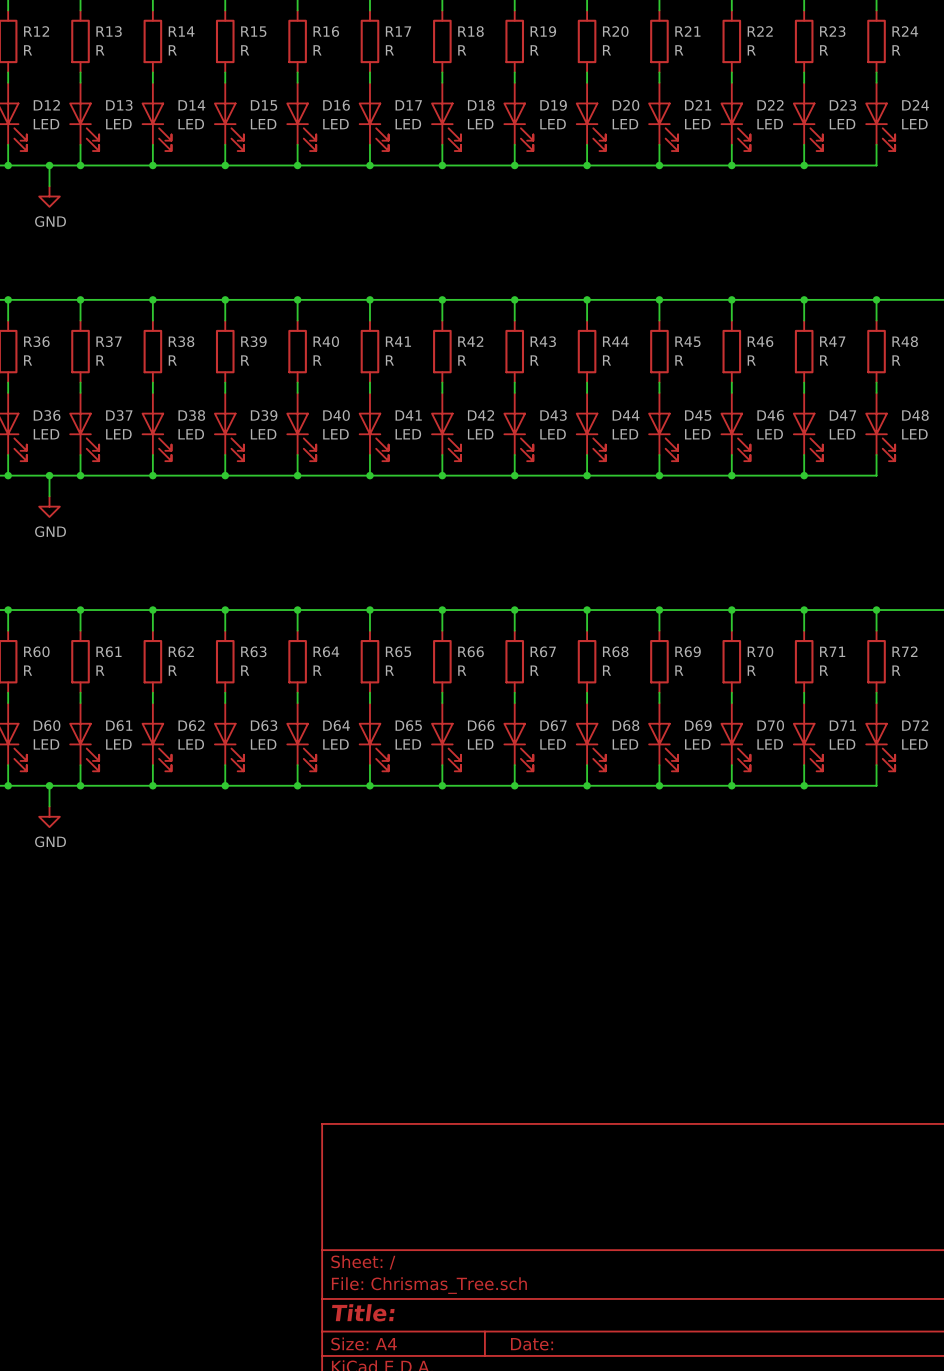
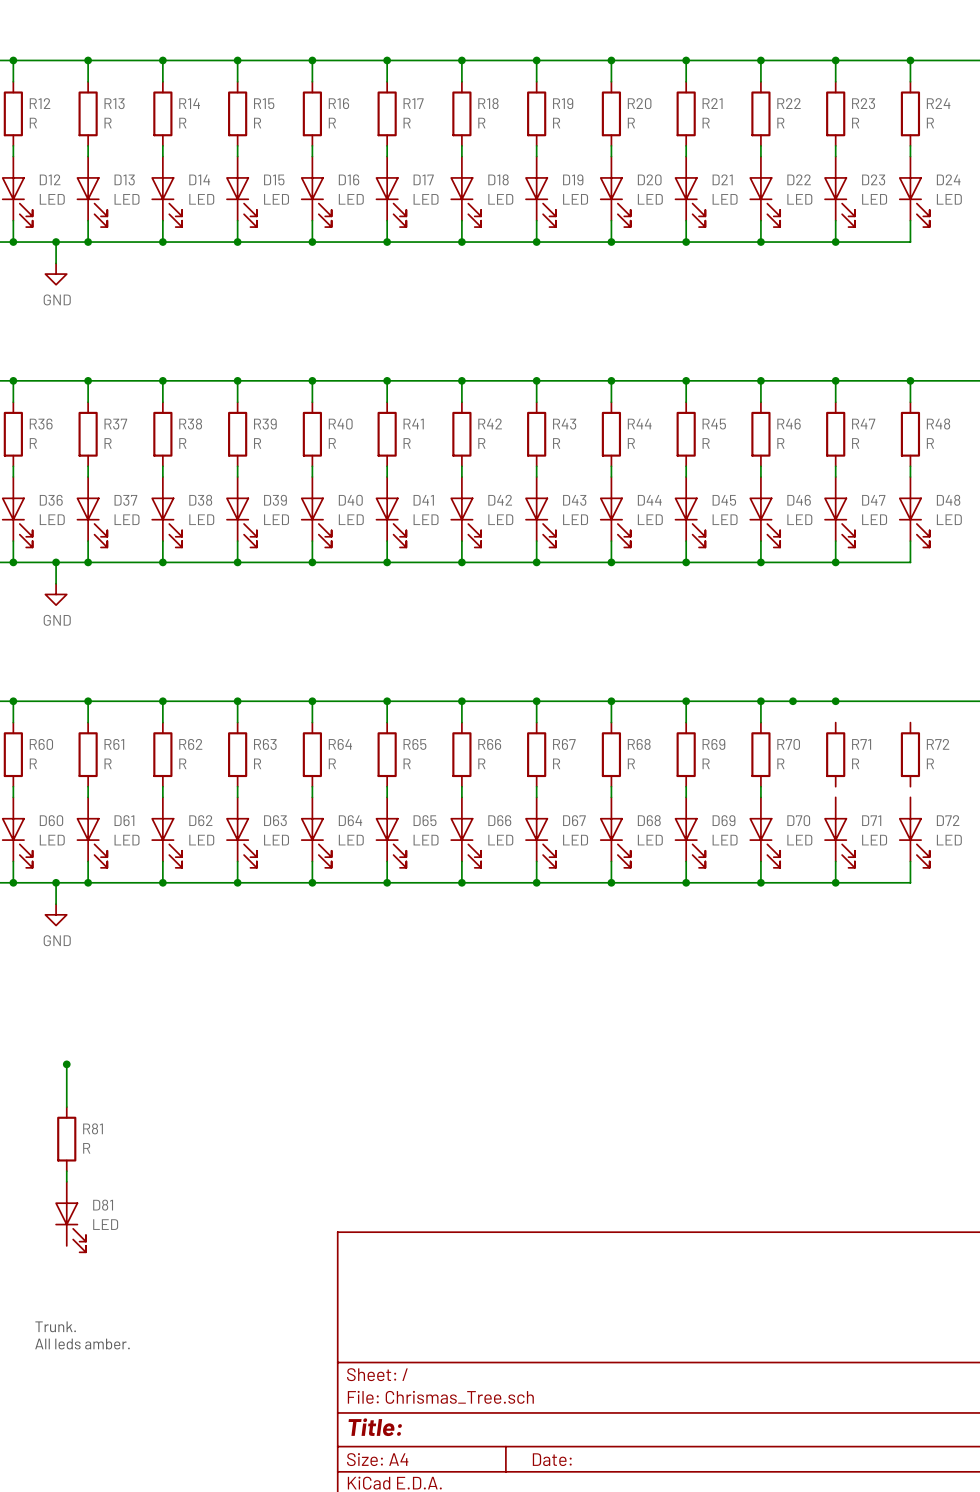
junction: none -> (792, 701)
wire: (804, 610) (804, 630) -> none
wire: (876, 610) (876, 630) -> none
junction: (876, 610) -> none
wire: (804, 692) (804, 703) -> none
wire: (876, 692) (876, 703) -> none
wire: none -> (66, 1064) (66, 1107)
junction: none -> (66, 1064)
R81: none -> R (66, 1139)
wire: none -> (66, 1171) (66, 1181)
D81: none -> LED (70, 1217)
text: none -> Trunk. (55, 1326)
text: none -> All leds amber. (82, 1344)

